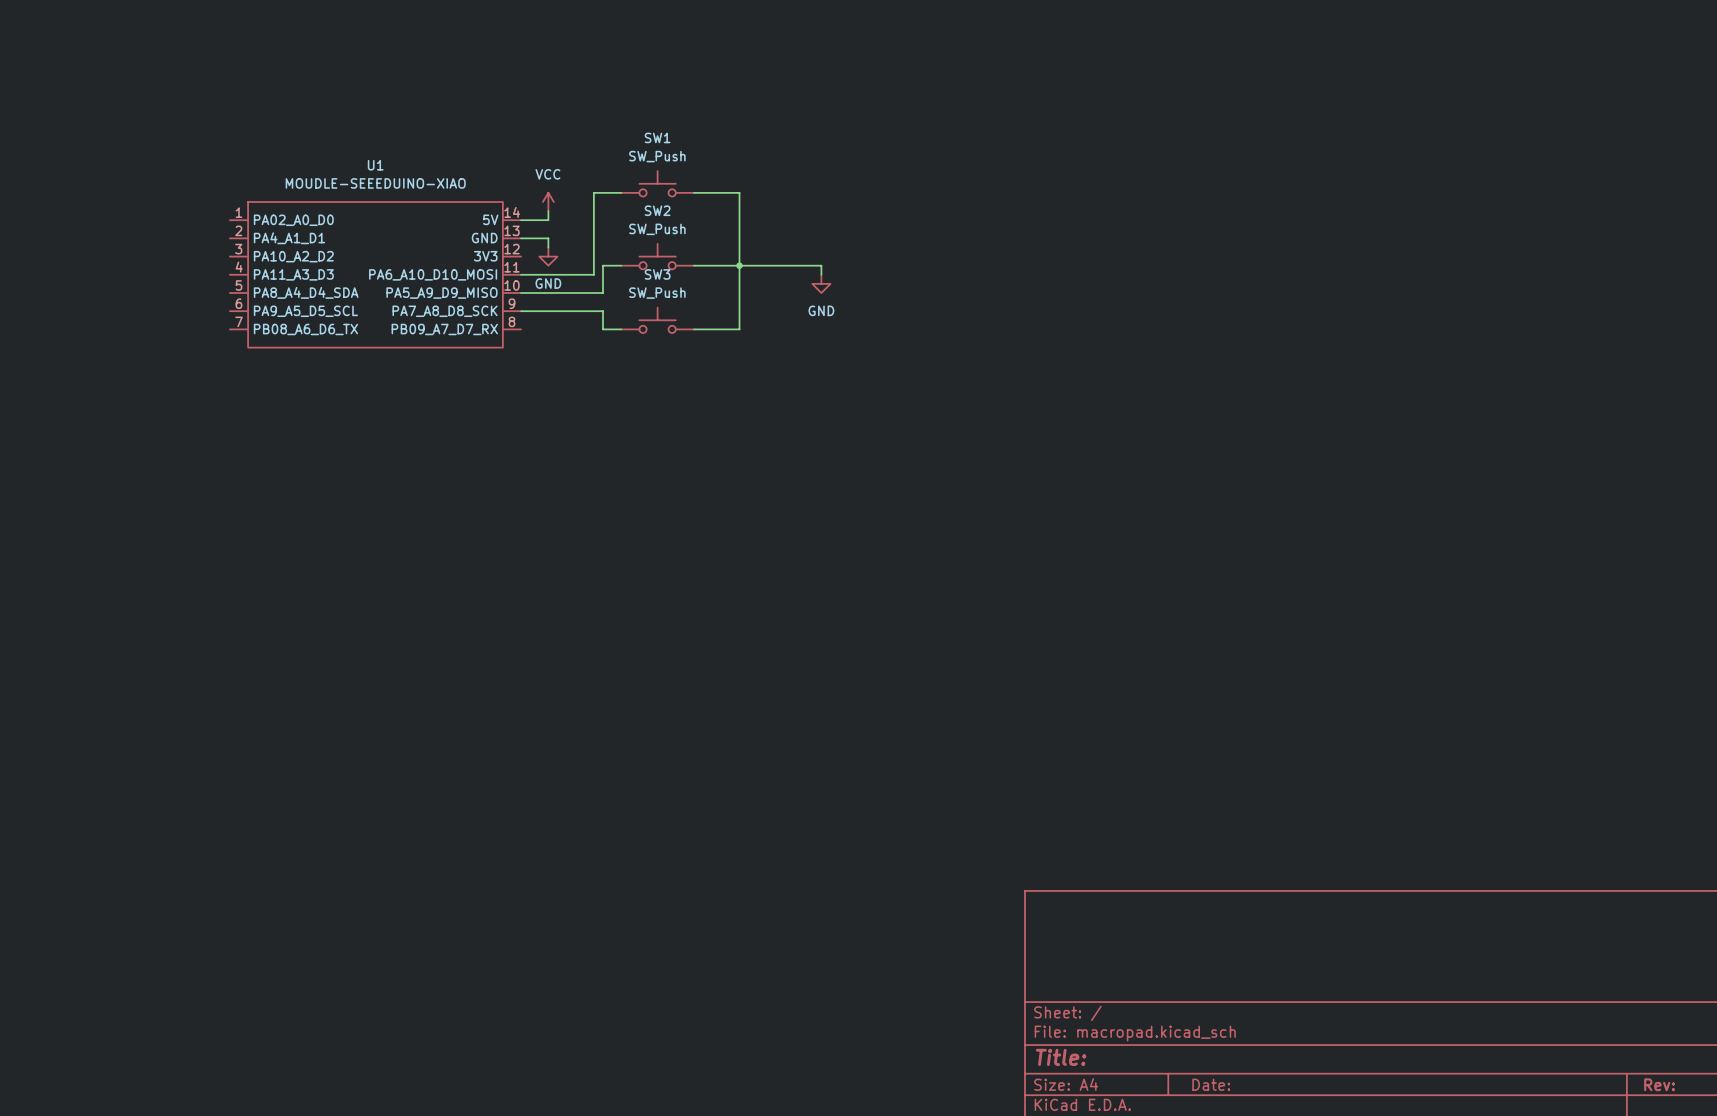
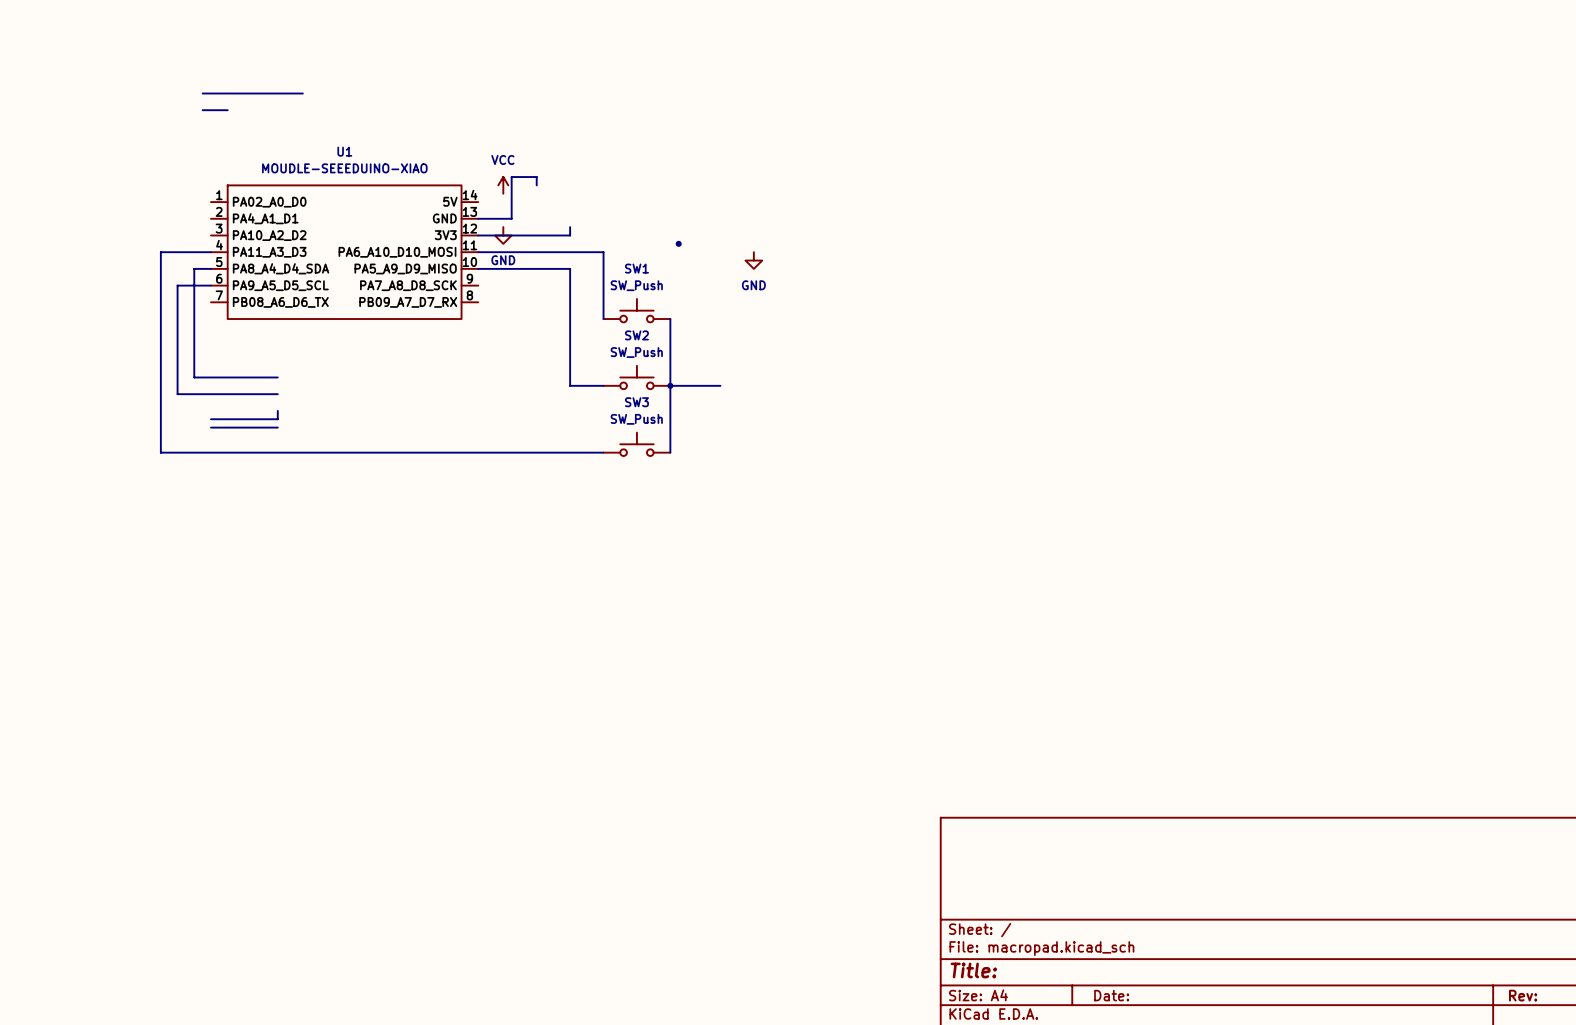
wire: none -> (202, 93) (302, 93)
wire: none -> (202, 110) (227, 110)
SW1 position: (657, 183) -> (636, 310)
wire: (621, 192) (593, 192) (593, 274) -> (603, 319) (603, 252) (545, 252)
wire: (694, 192) (739, 192) (739, 329) (694, 329) -> none
wire: (548, 211) (548, 220) (521, 220) -> none
wire: (548, 238) (548, 247) -> (503, 218) (511, 218) (511, 177) (536, 177) (536, 185)
wire: none -> (570, 227) (570, 235) (478, 235)
SW2 position: (657, 256) -> (636, 377)
wire: (621, 265) (602, 265) (602, 292) -> (603, 385) (570, 385) (570, 268) (553, 268)
wire: (694, 265) (821, 265) (821, 274) -> none
wire: none -> (210, 252) (160, 252) (160, 452) (603, 452)
wire: none -> (210, 268) (194, 268) (194, 377) (277, 377)
wire: none -> (210, 285) (177, 285) (177, 394) (277, 394)
wire: (521, 311) (602, 311) (602, 329) (621, 329) -> none
SW3 position: (657, 320) -> (636, 444)
wire: none -> (670, 319) (670, 452)
wire: none -> (670, 385) (720, 385)
junction: none -> (670, 385)
wire: none -> (277, 410) (277, 419) (210, 419)
wire: none -> (210, 427) (277, 427)

